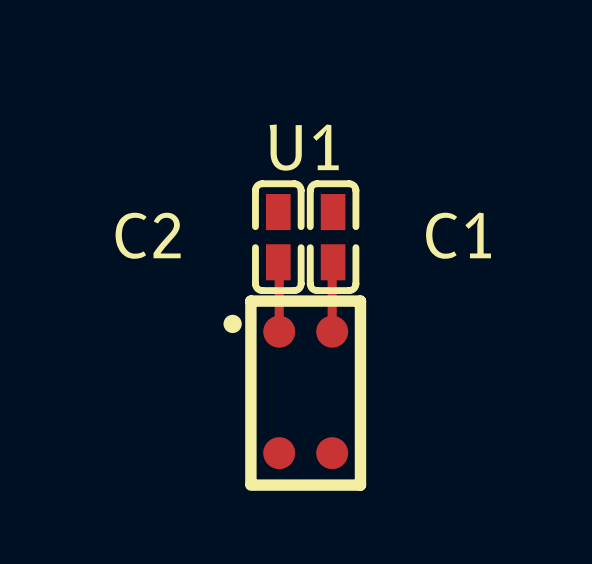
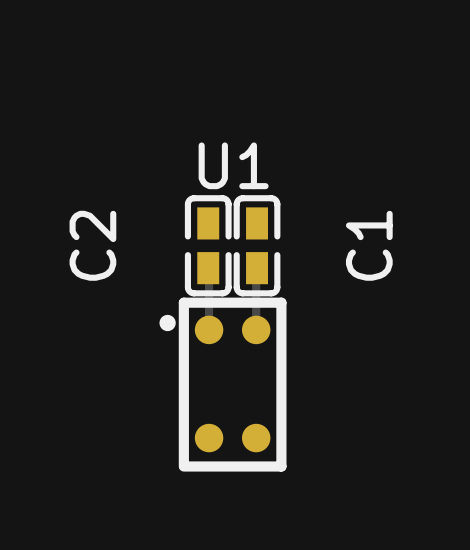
C2 name rotation: 0° (148, 235) -> 90° counterclockwise (92, 245)
C1 name rotation: 0° (458, 235) -> 90° counterclockwise (369, 245)

